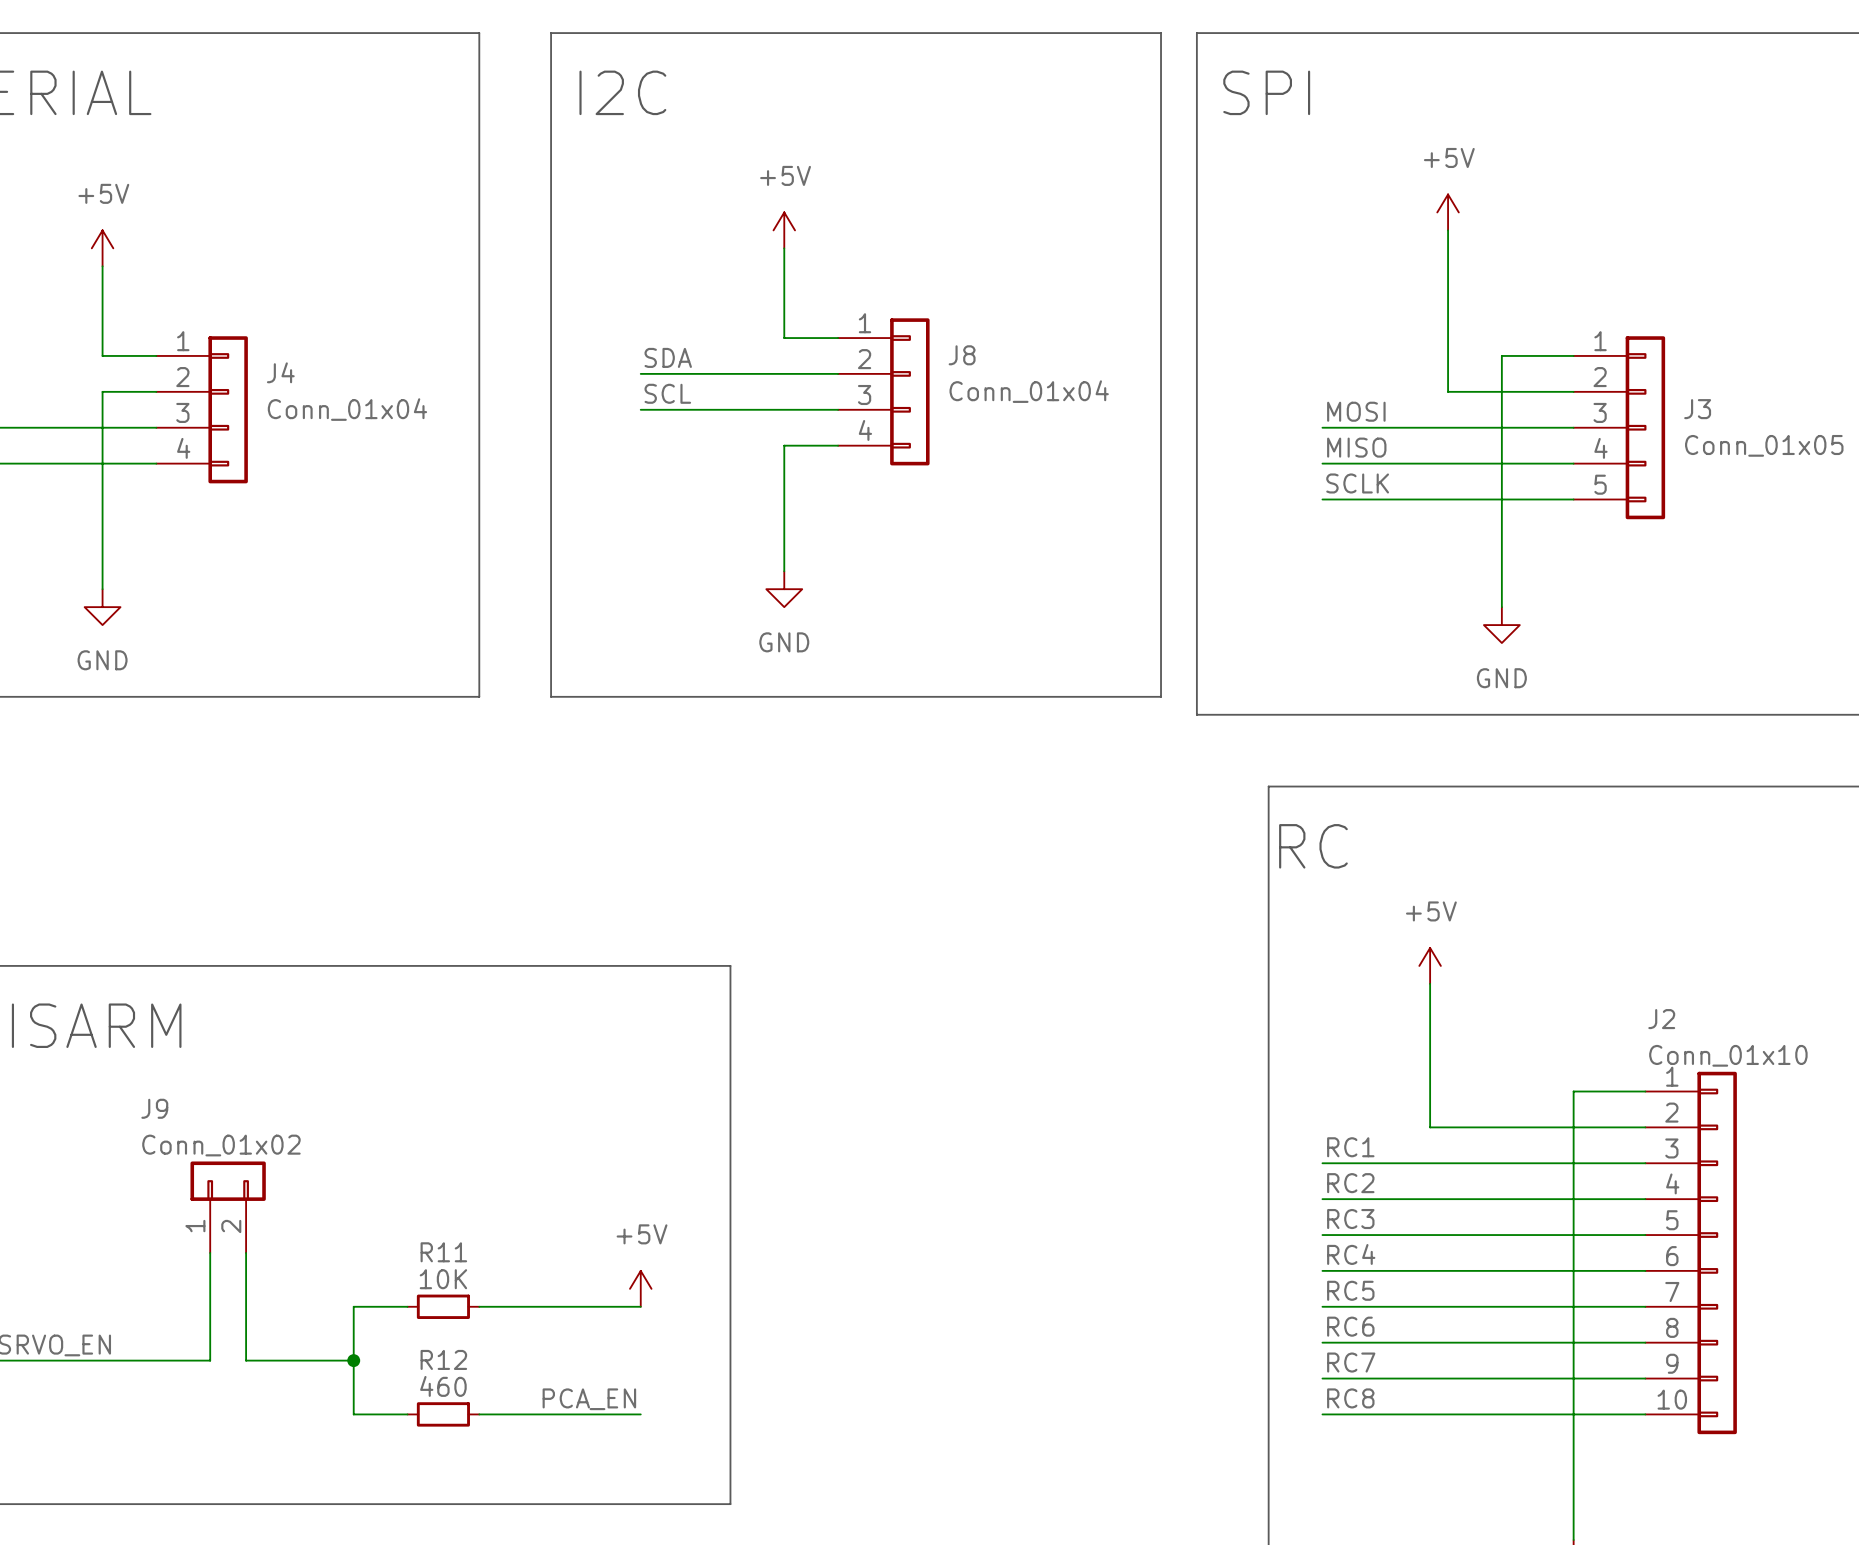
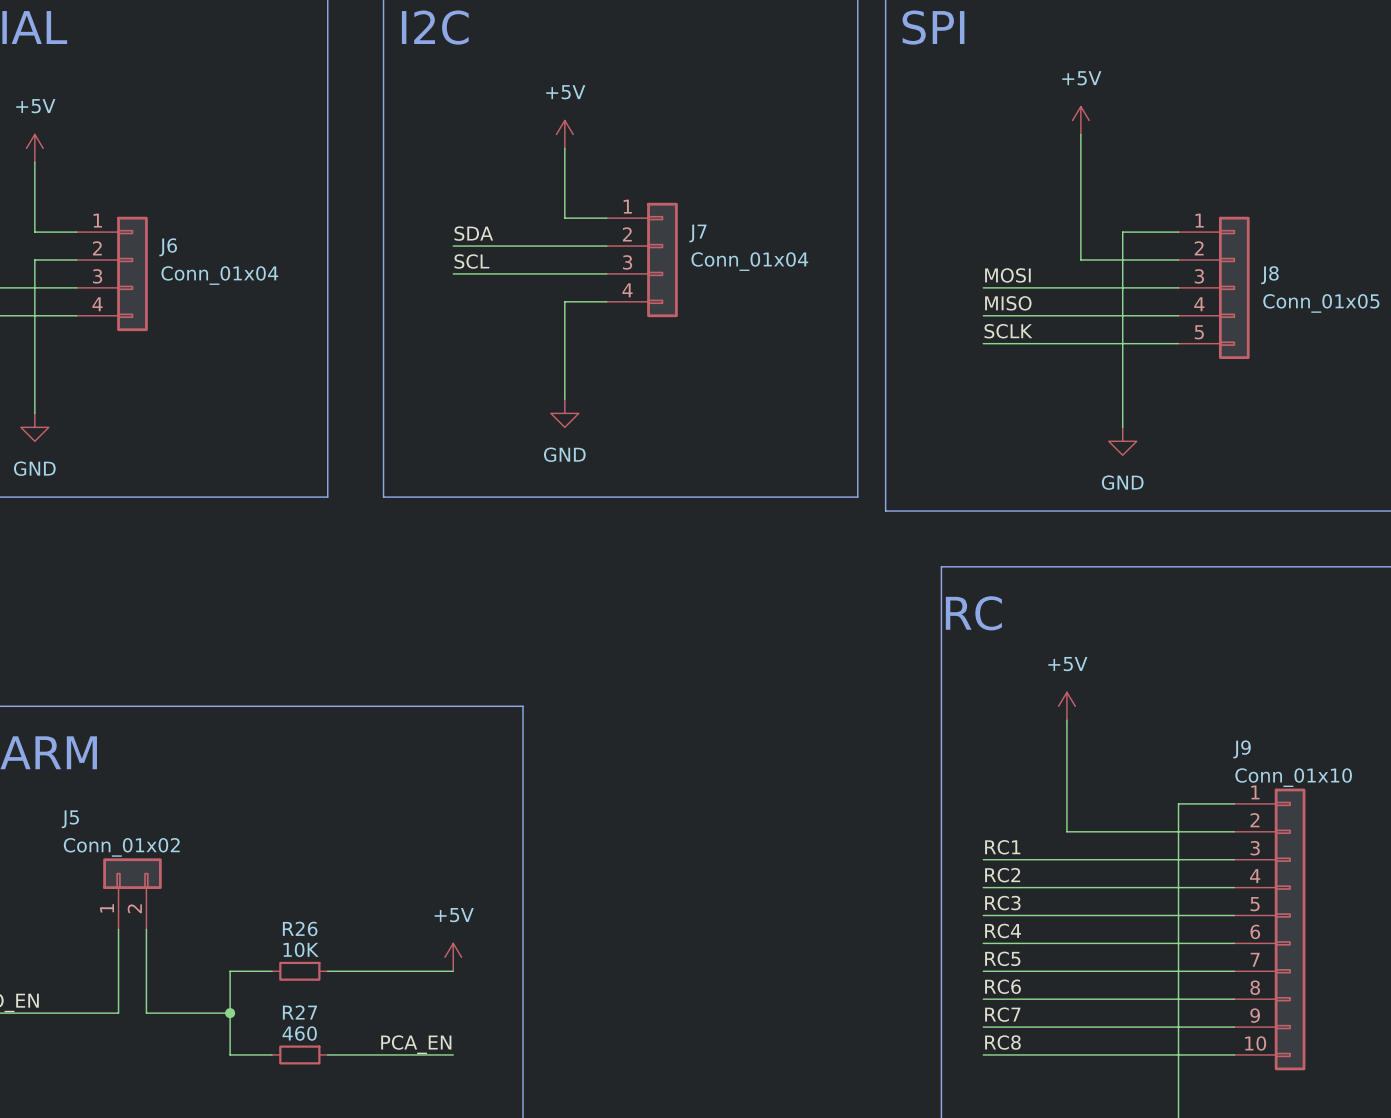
J8 name: J8 (962, 355) -> J7 (697, 233)
J4 name: J4 (280, 372) -> J6 (168, 247)
J3 name: J3 (1697, 409) -> J8 (1269, 275)
J2 name: J2 (1661, 1019) -> J9 (1242, 749)
J9 name: J9 (154, 1108) -> J5 (70, 819)
R11 name: R11 (443, 1252) -> R26 (300, 928)
R12 name: R12 (443, 1359) -> R27 (299, 1012)

